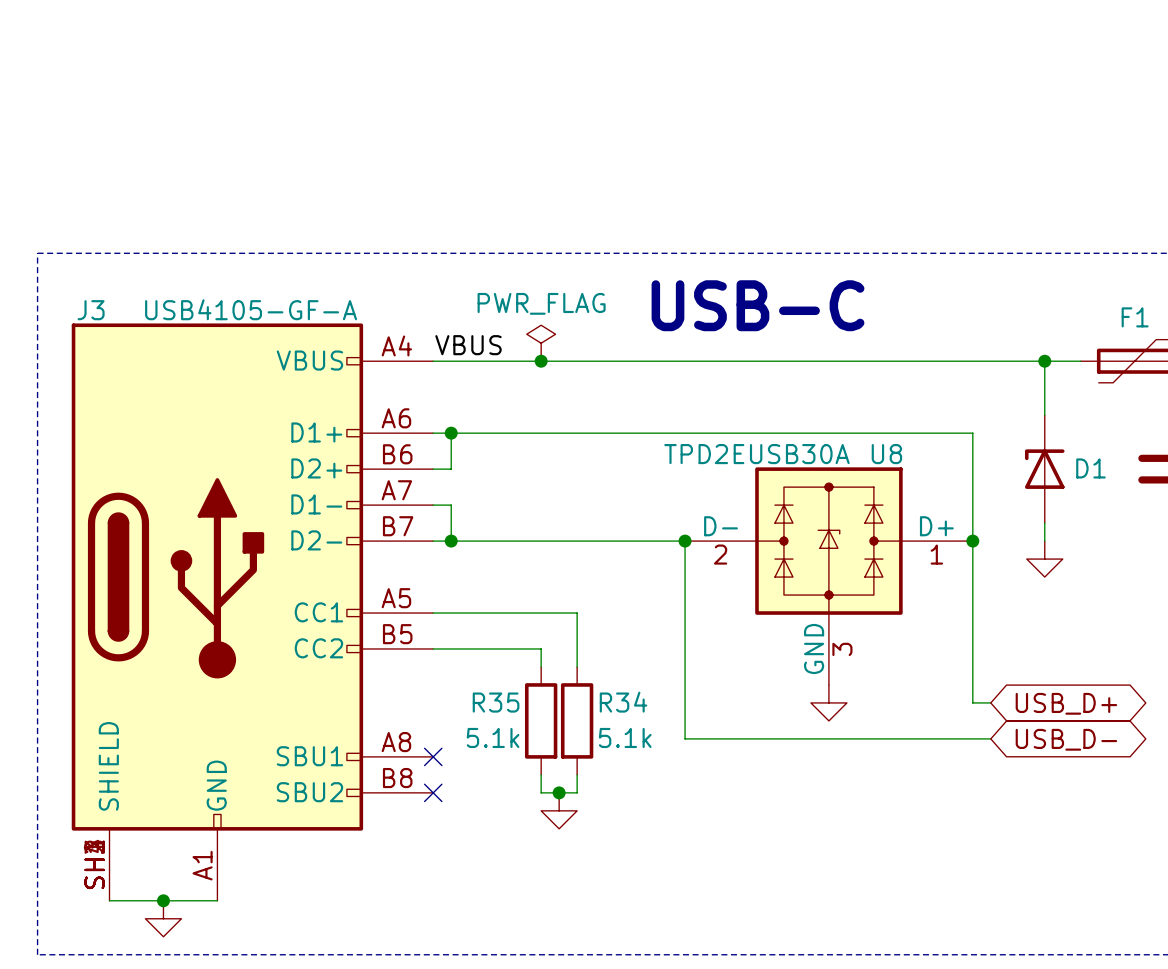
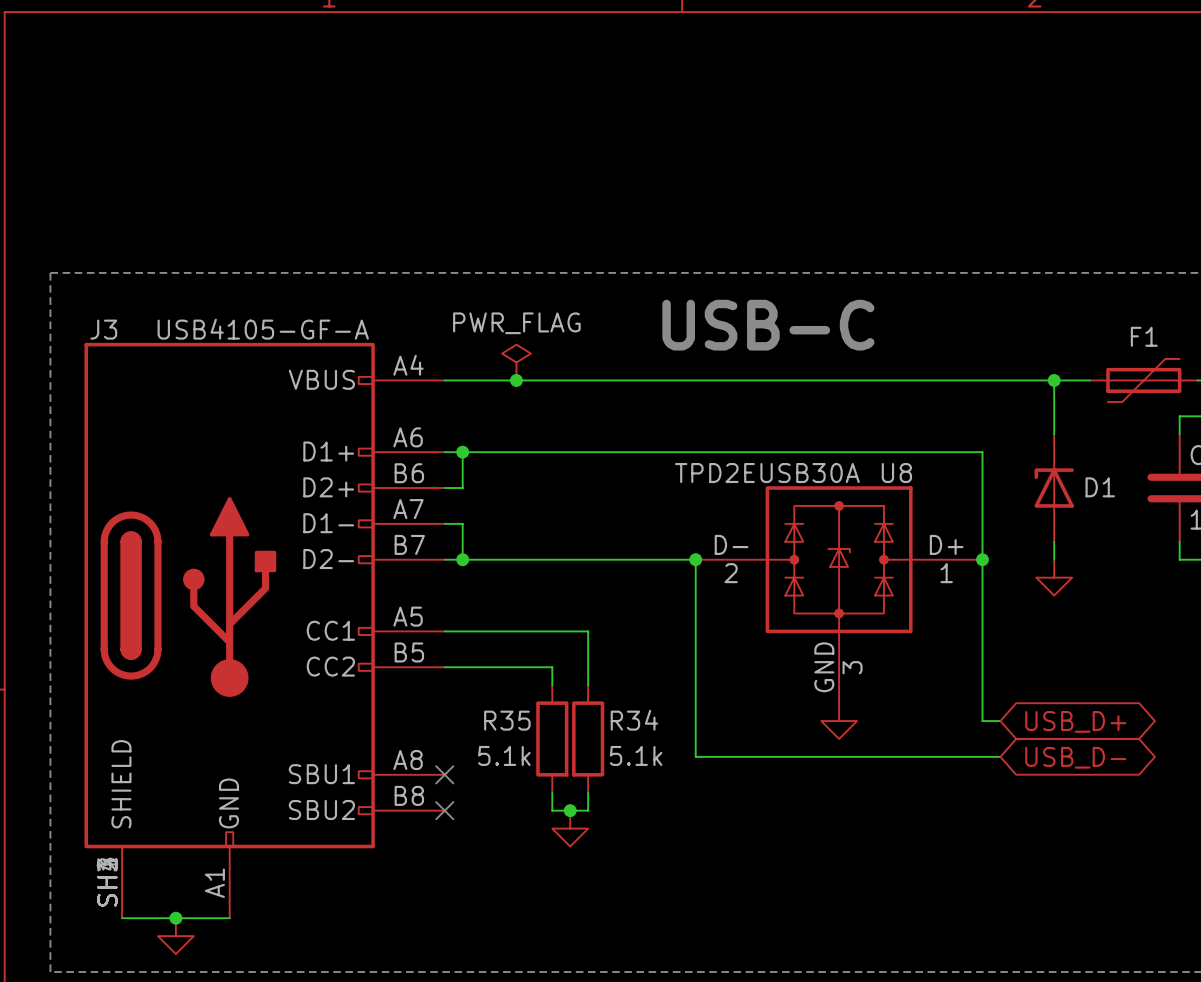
power symbol position: PWR_FLAG (541, 343) -> PWR_FLAG (516, 362)
label: VBUS (468, 345) -> none
junction position: (541, 361) -> (516, 380)

